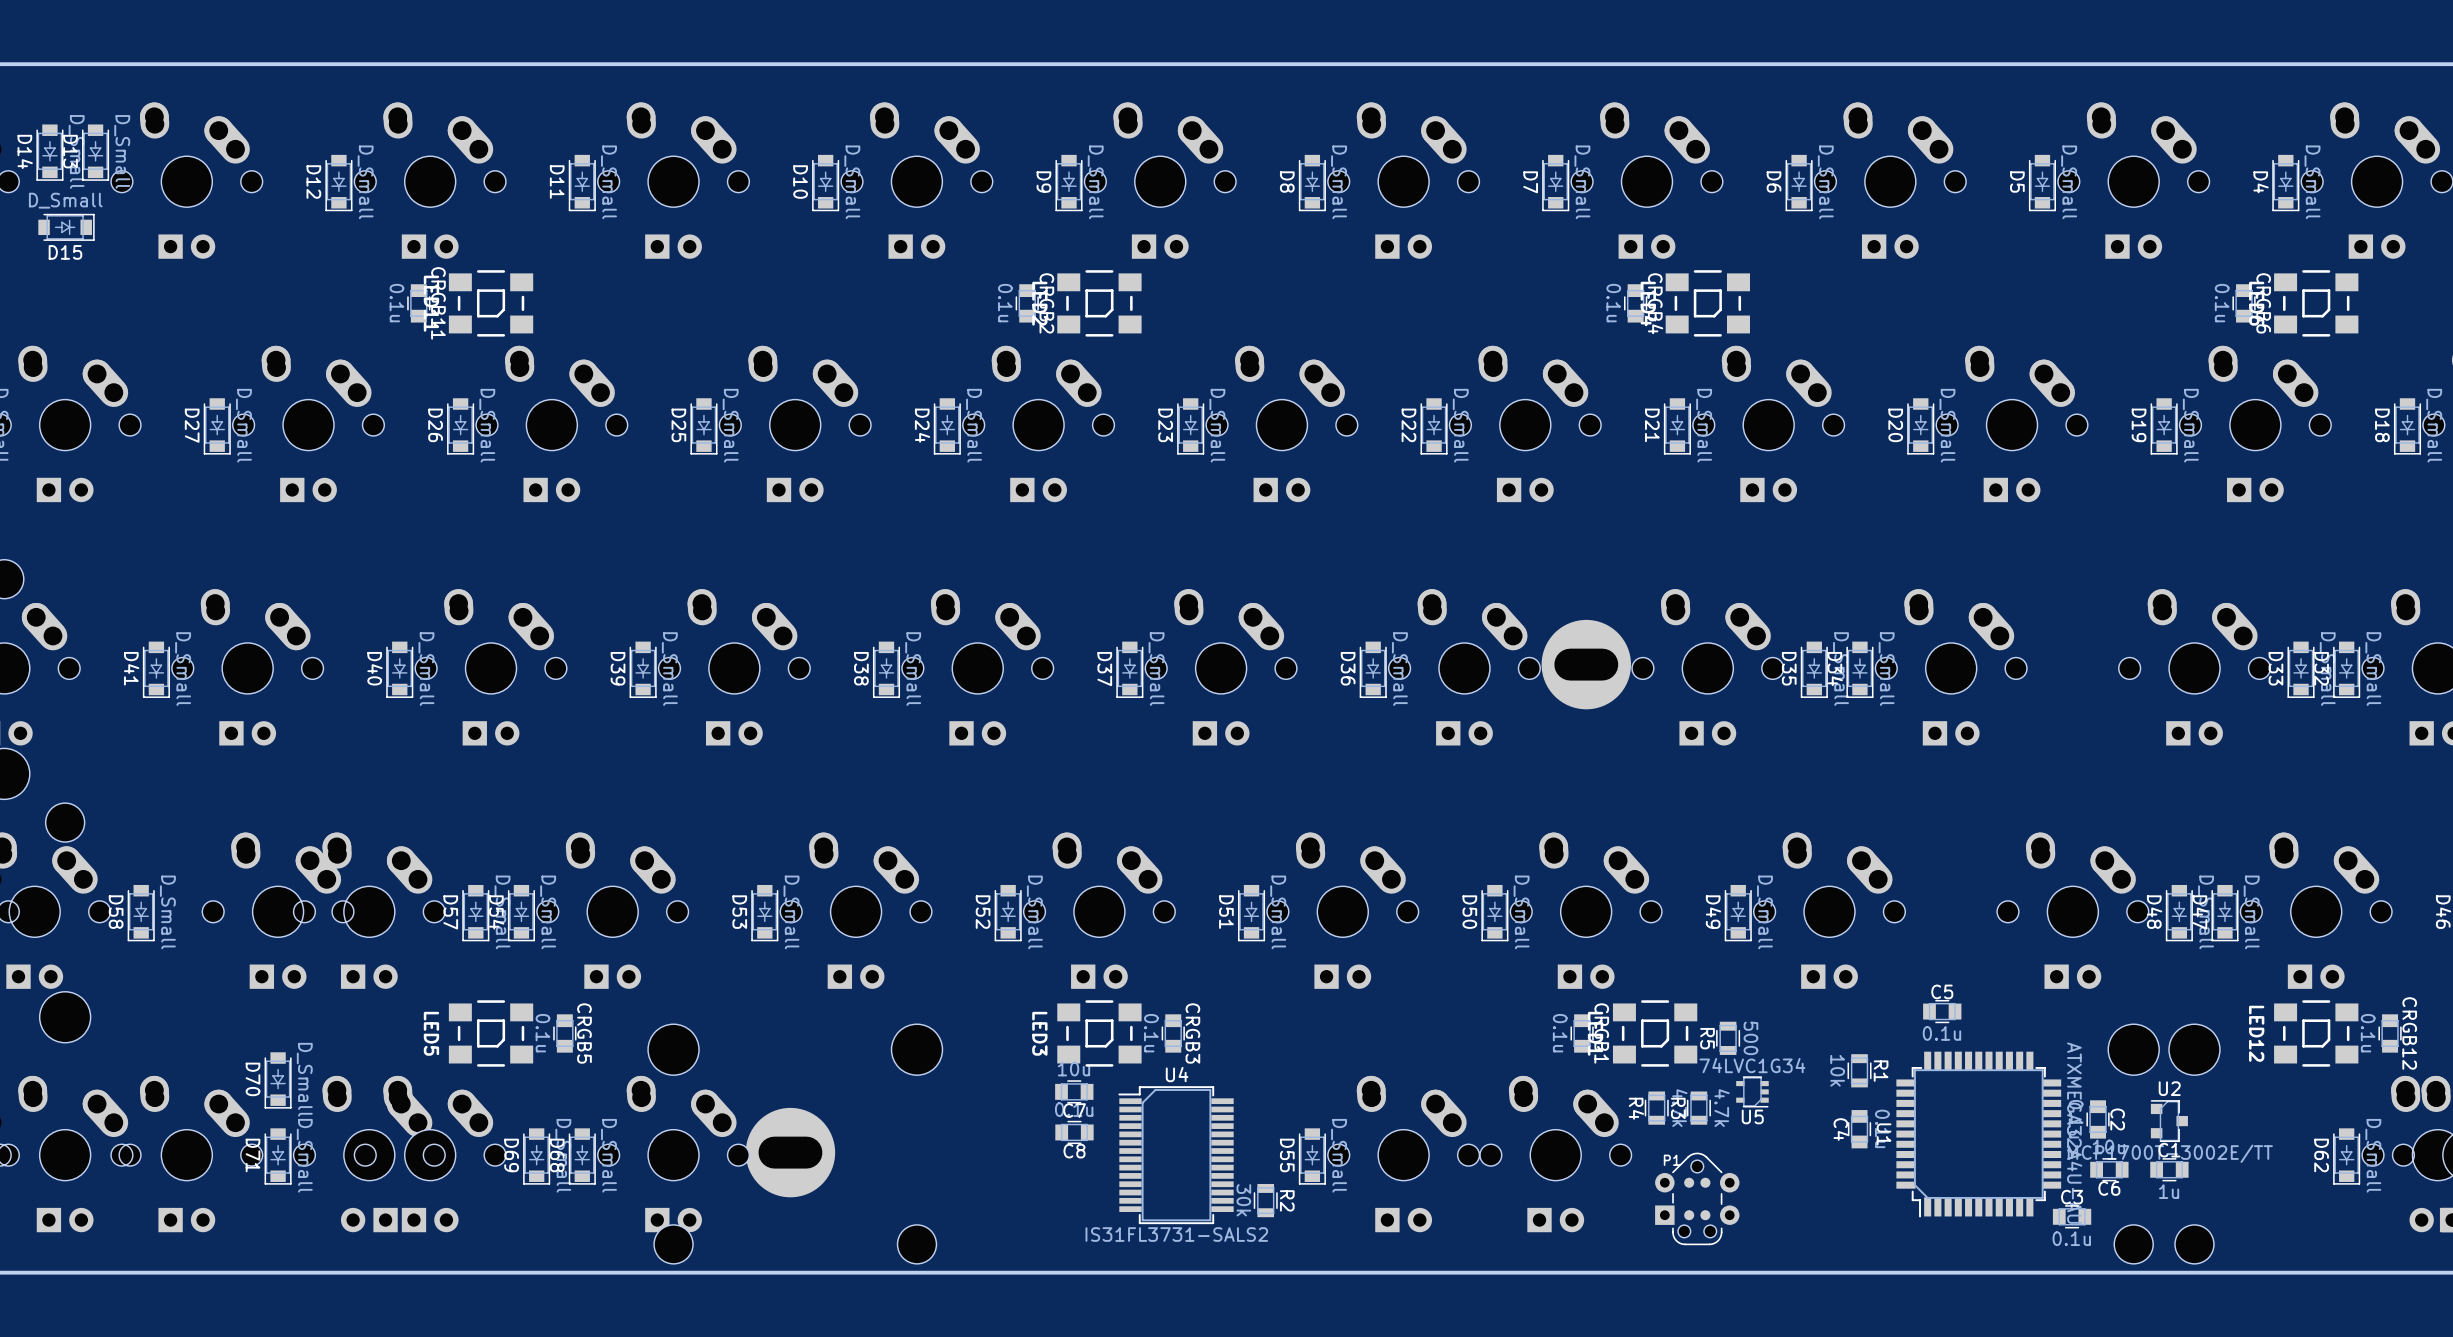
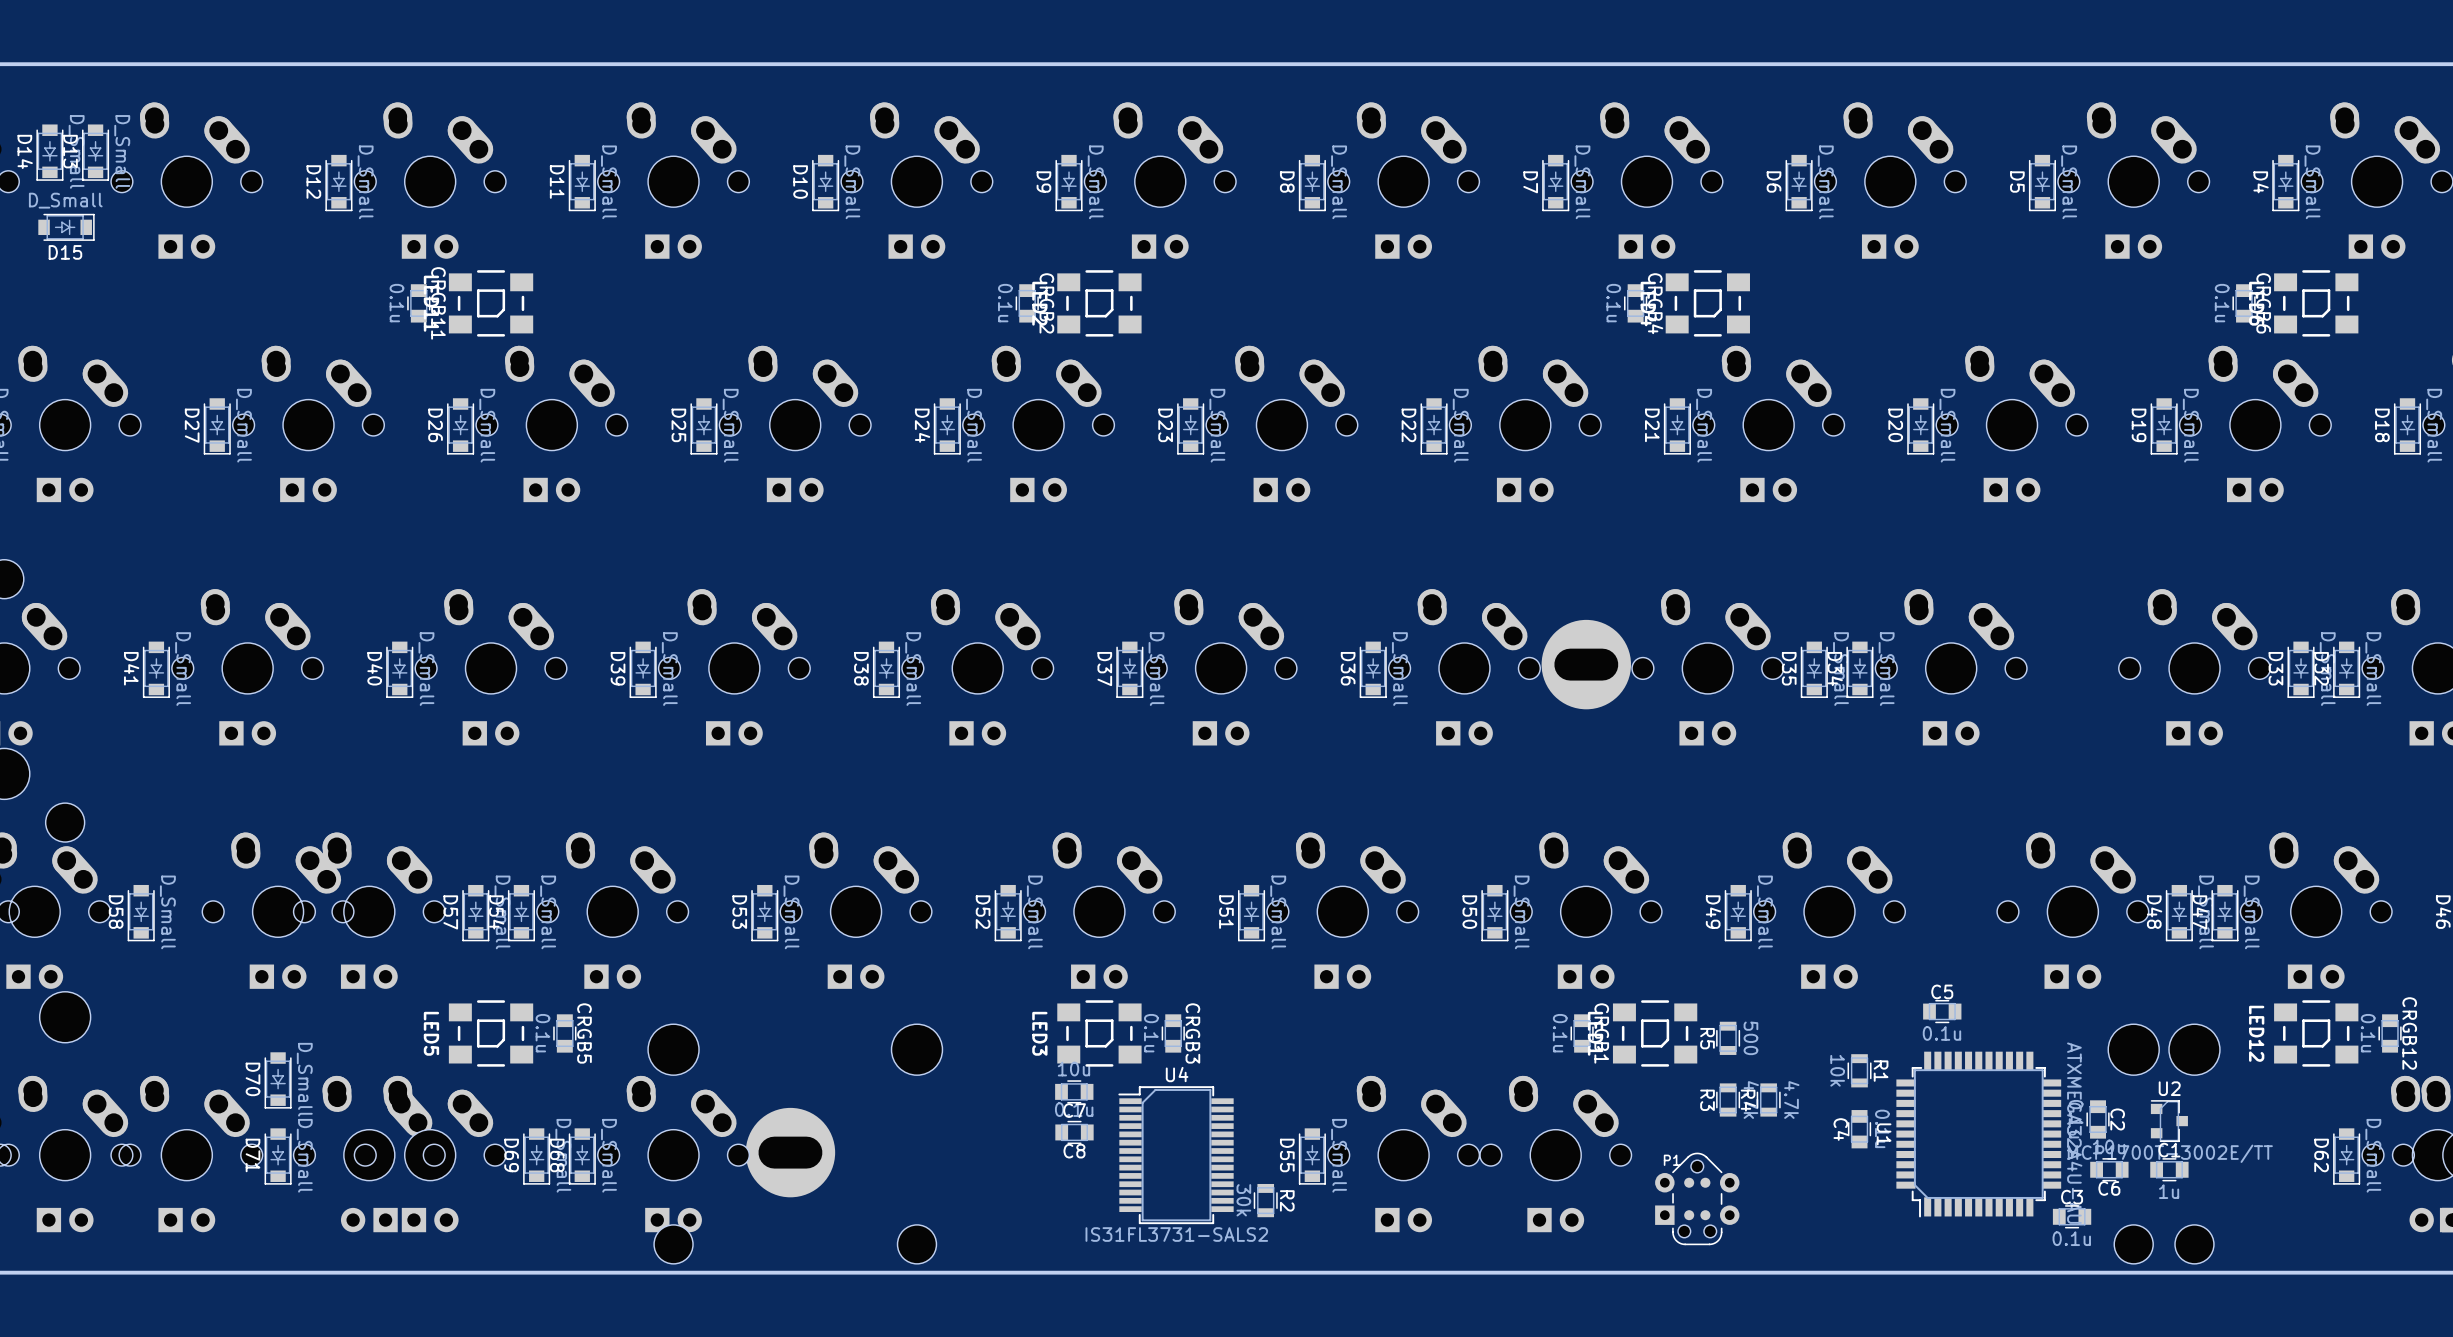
U5: 74LVC1G34 (1752, 1091) -> none
R4 position: (1656, 1108) -> (1768, 1099)
R3 position: (1698, 1108) -> (1728, 1099)

